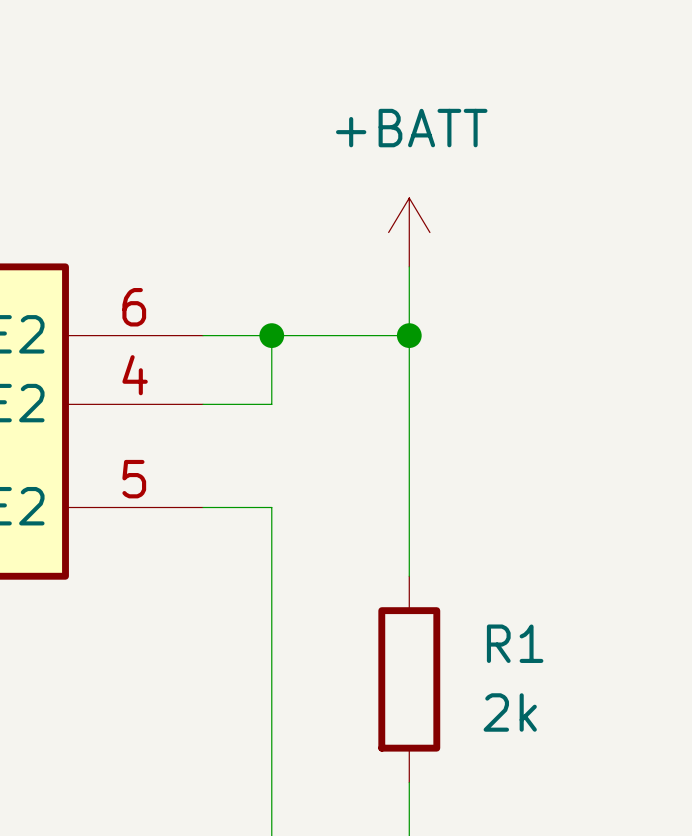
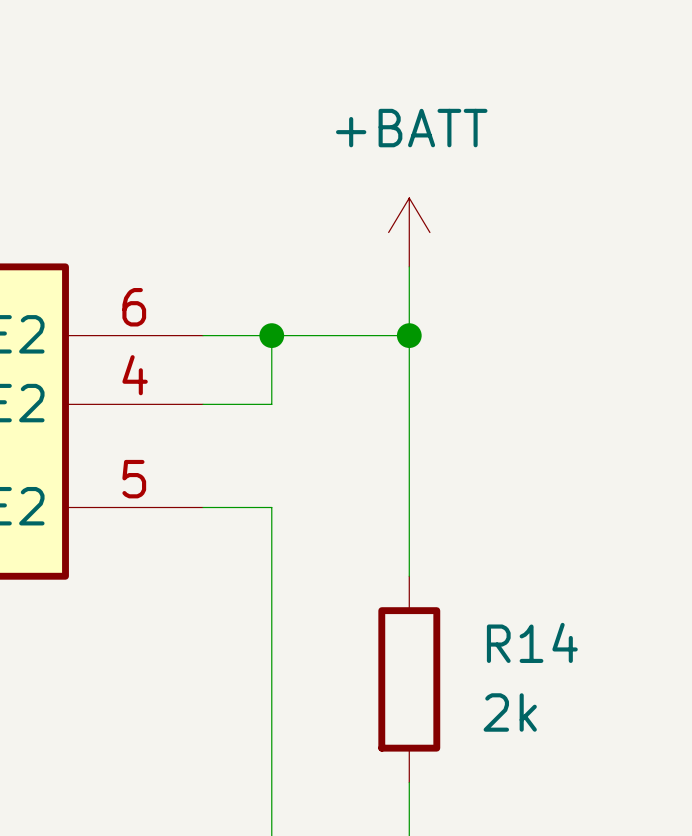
R1 name: R1 (515, 643) -> R14 (532, 642)

